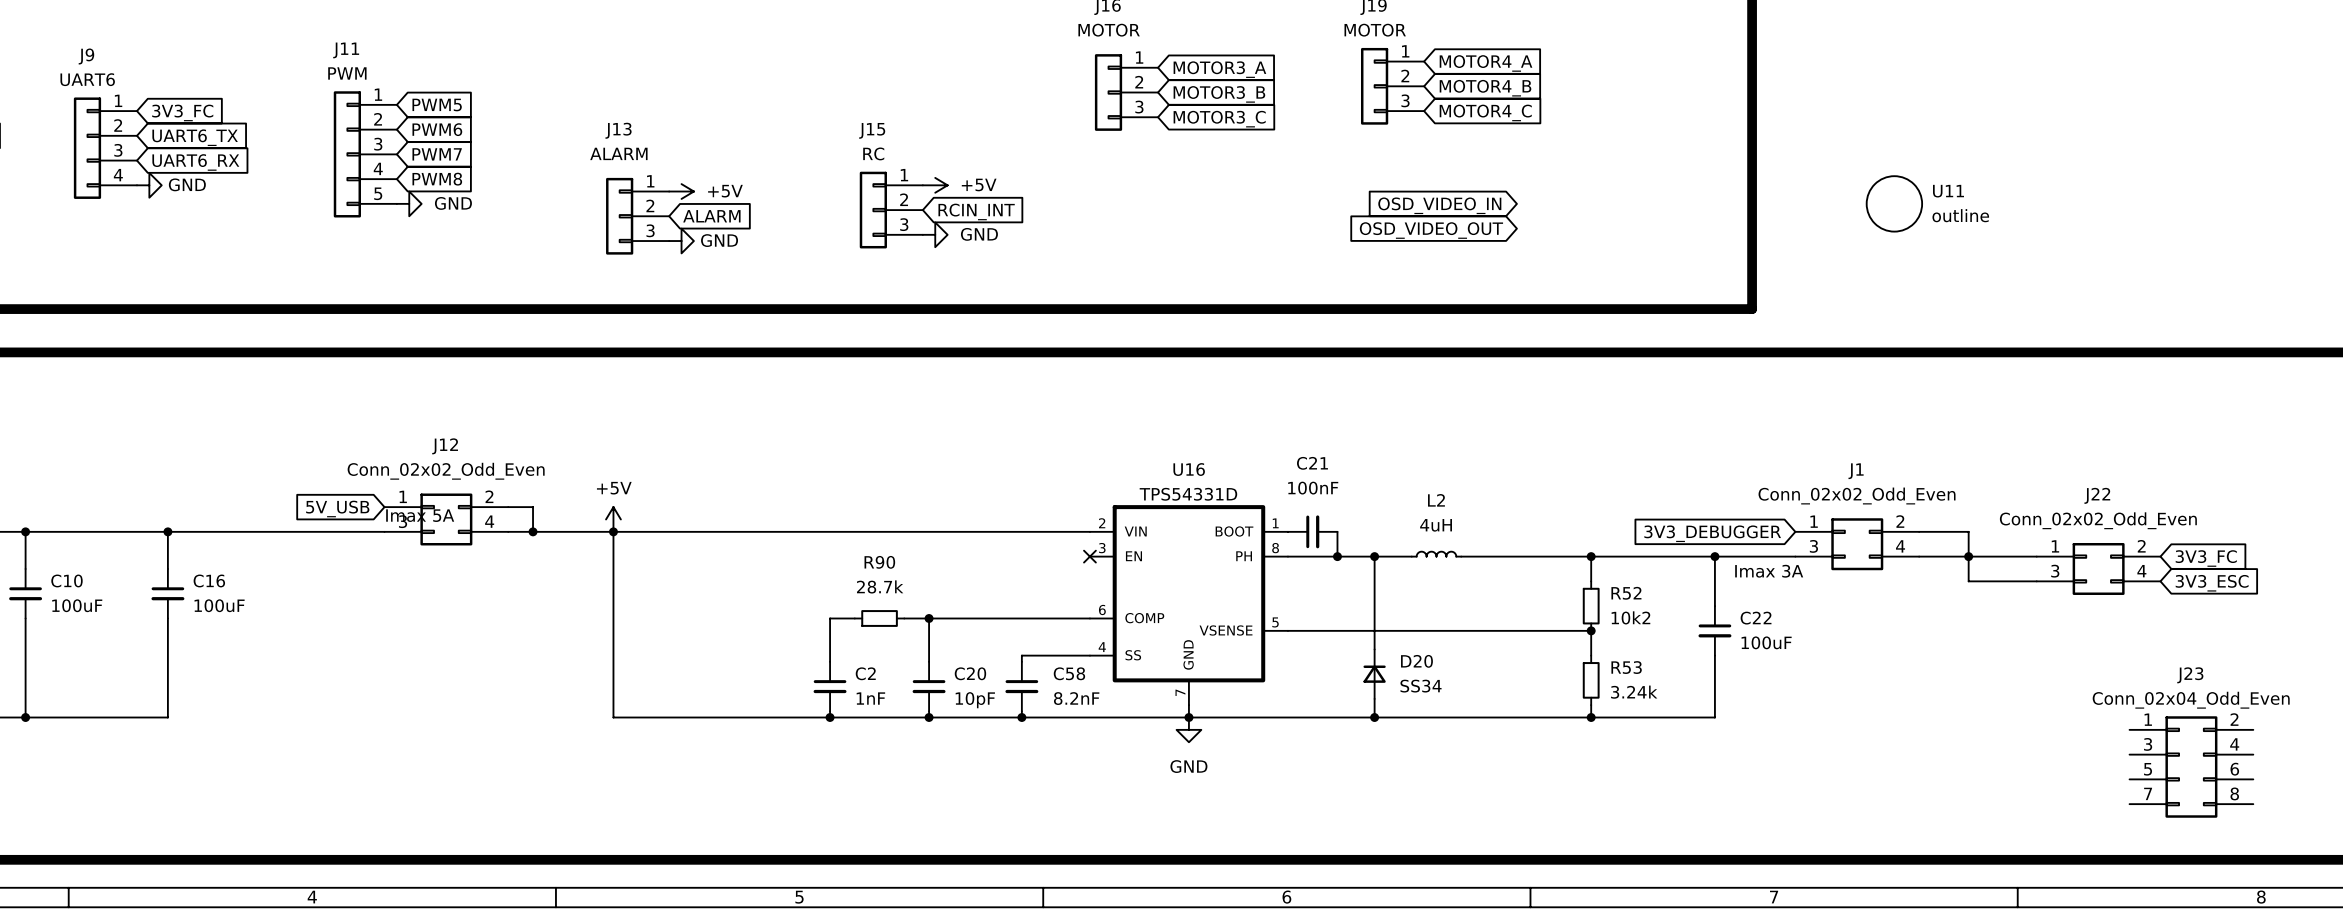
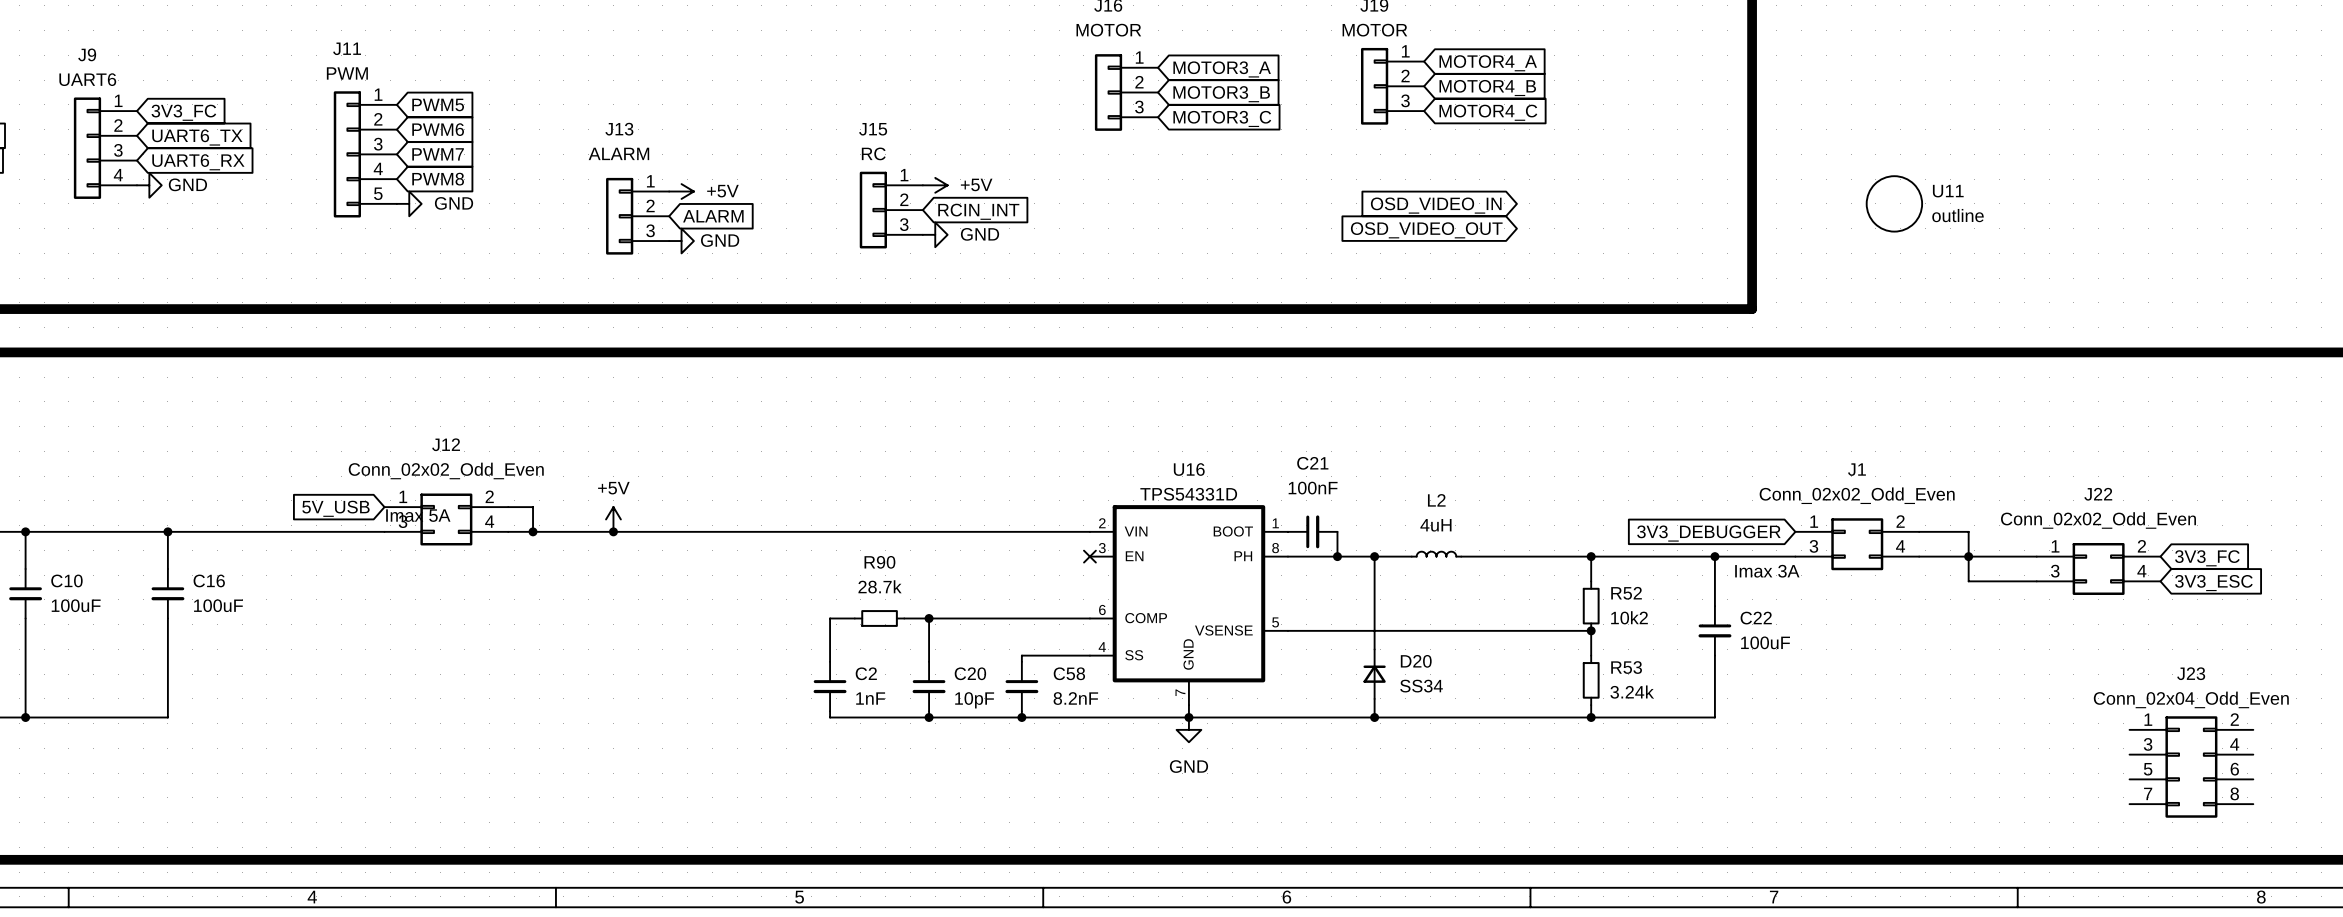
wire: (613, 531) (613, 717) (830, 717) -> none
junction: (830, 717) -> none

